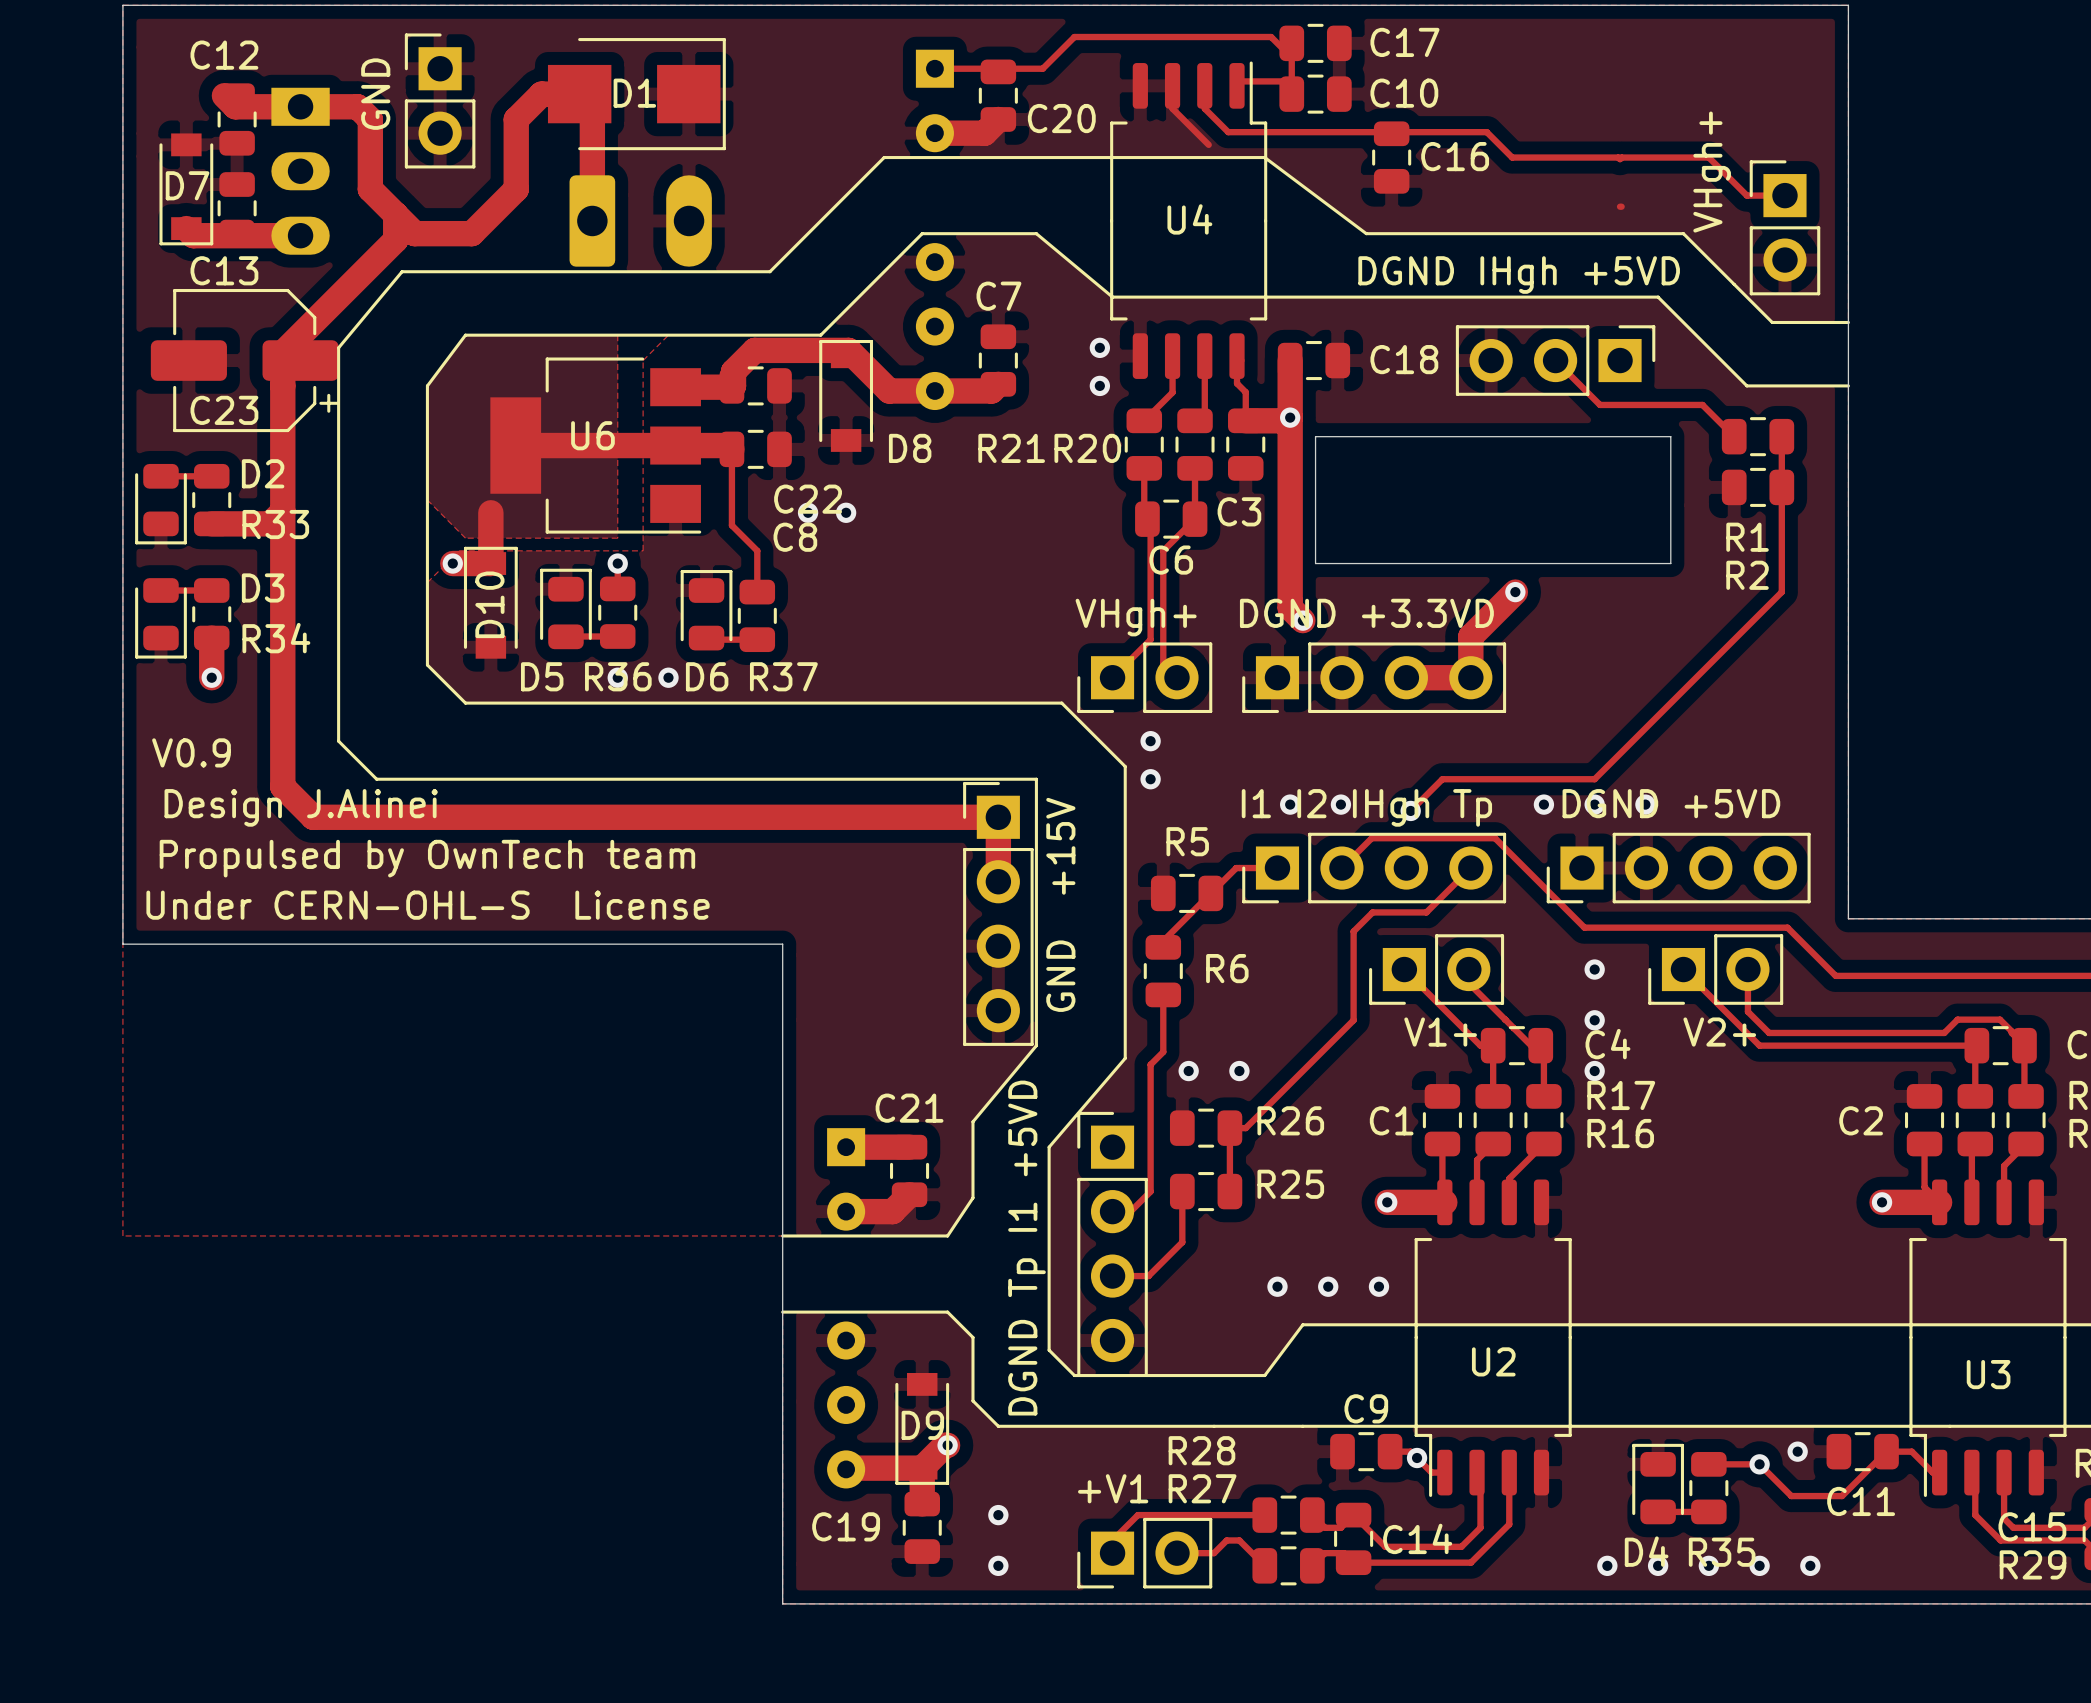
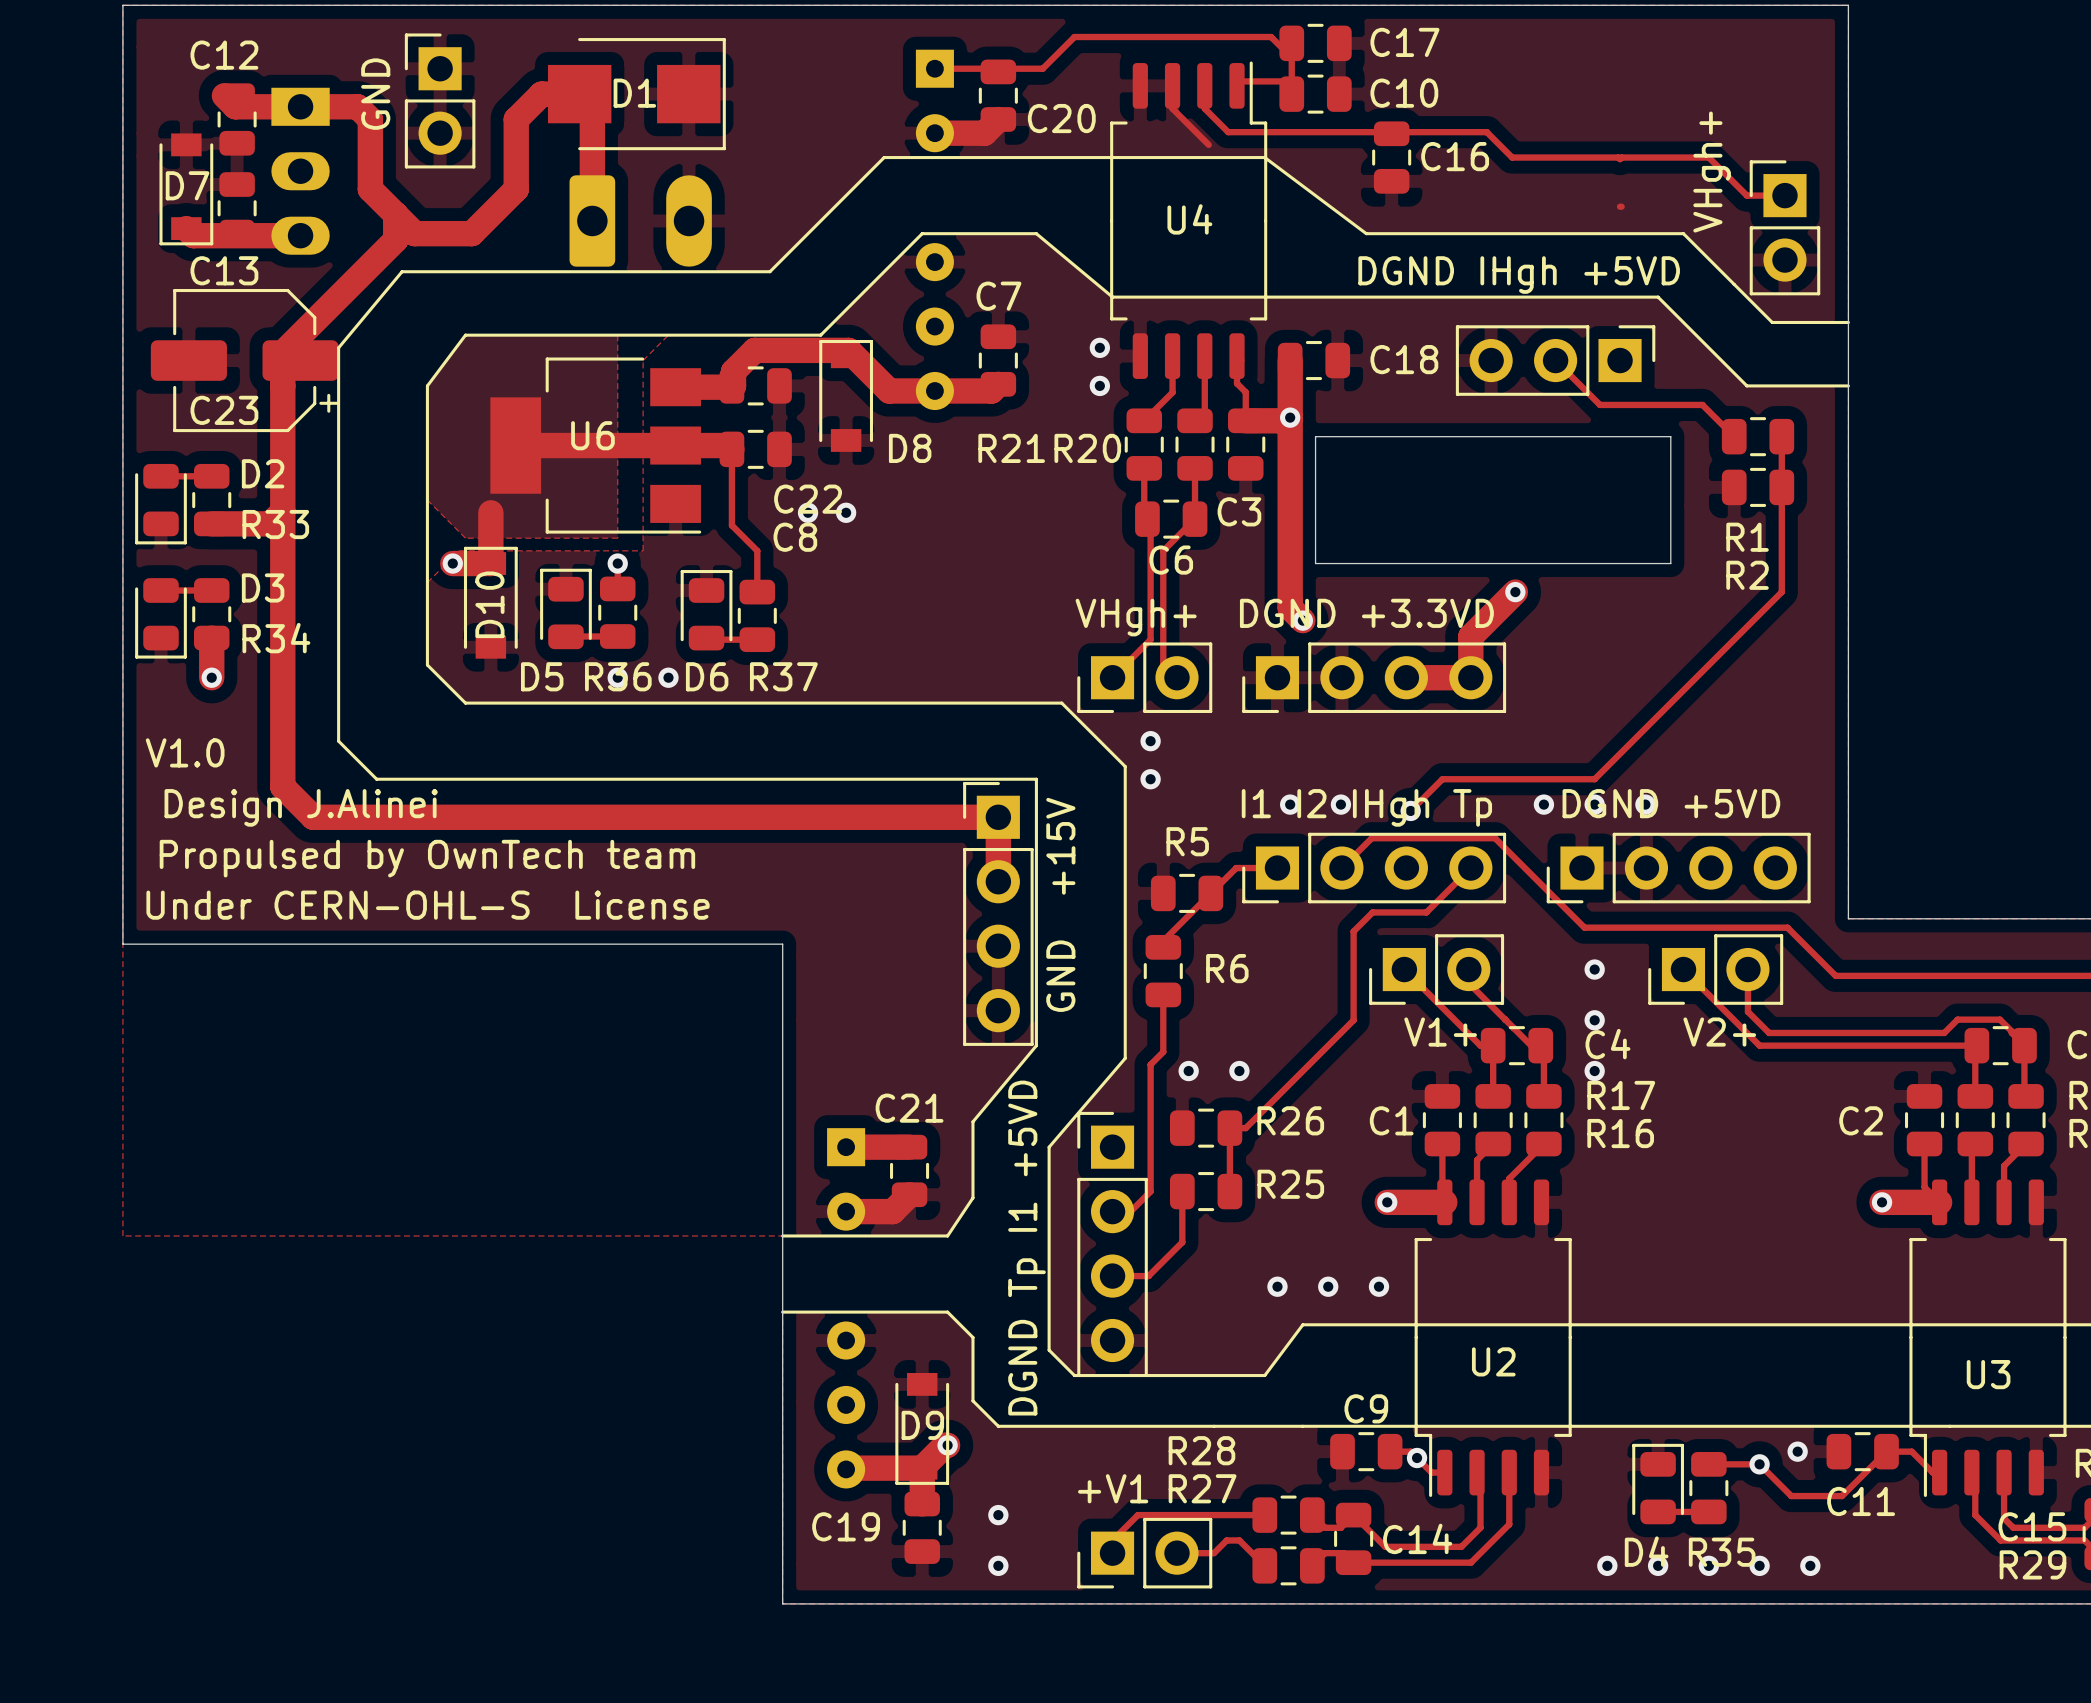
text: V0.9 (191, 752) -> V1.0 (185, 752)

